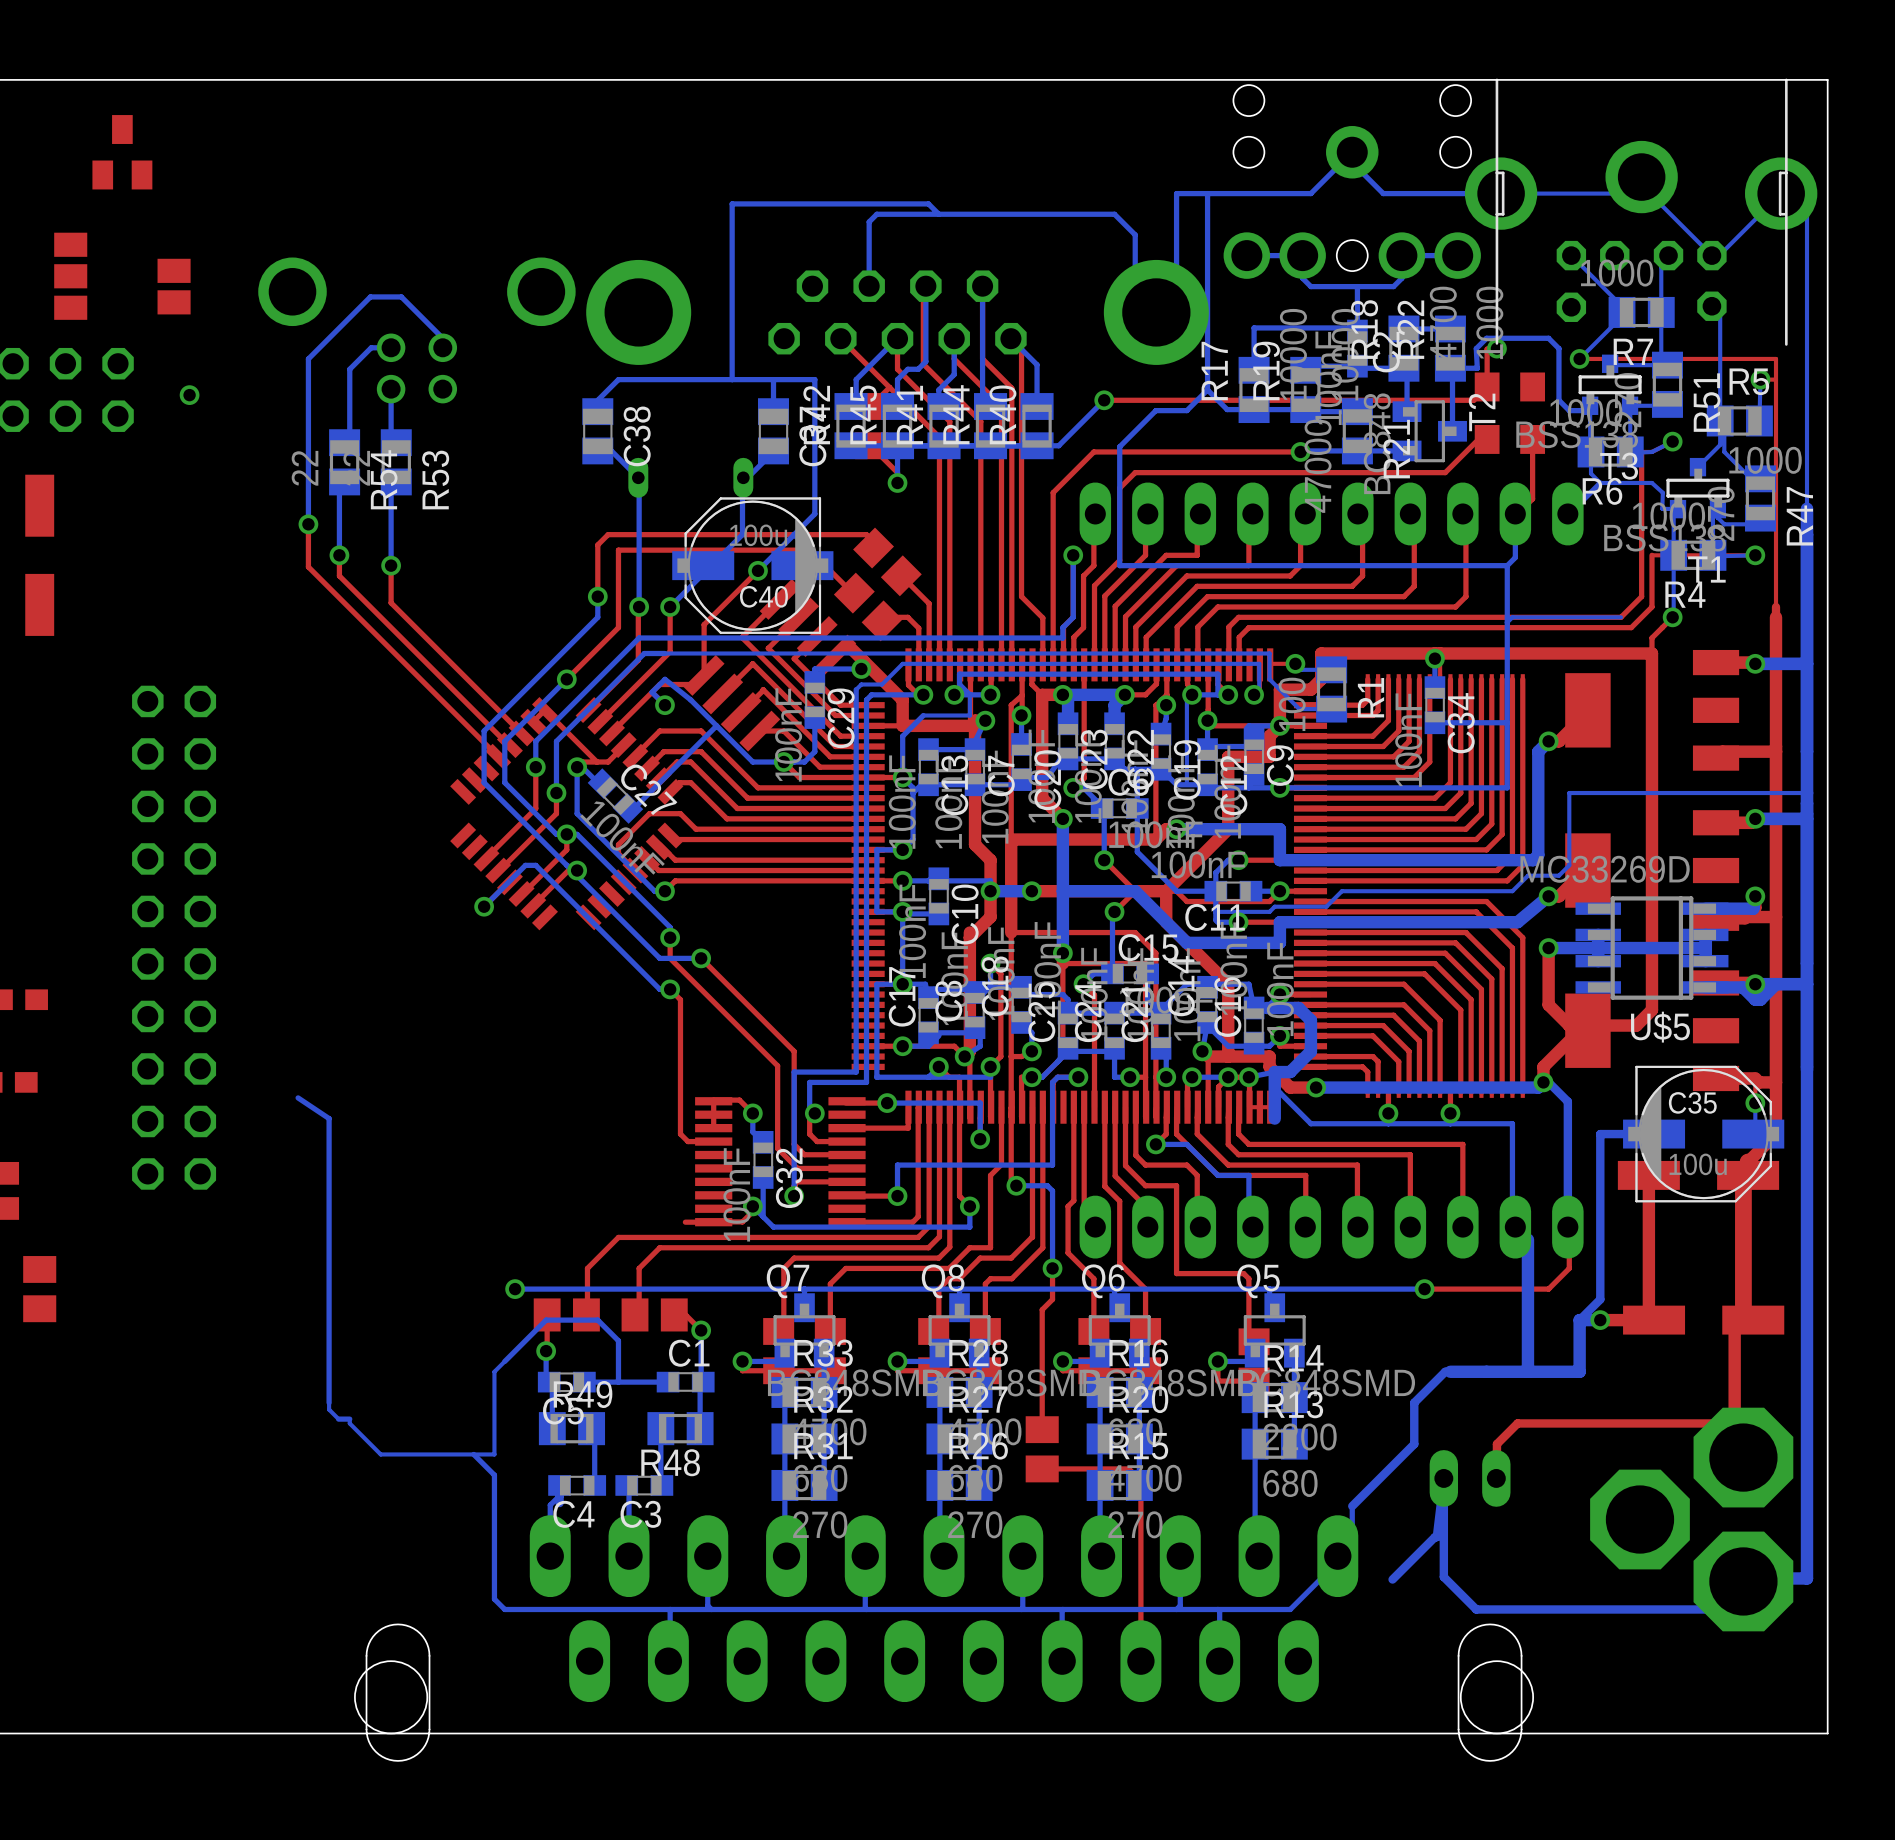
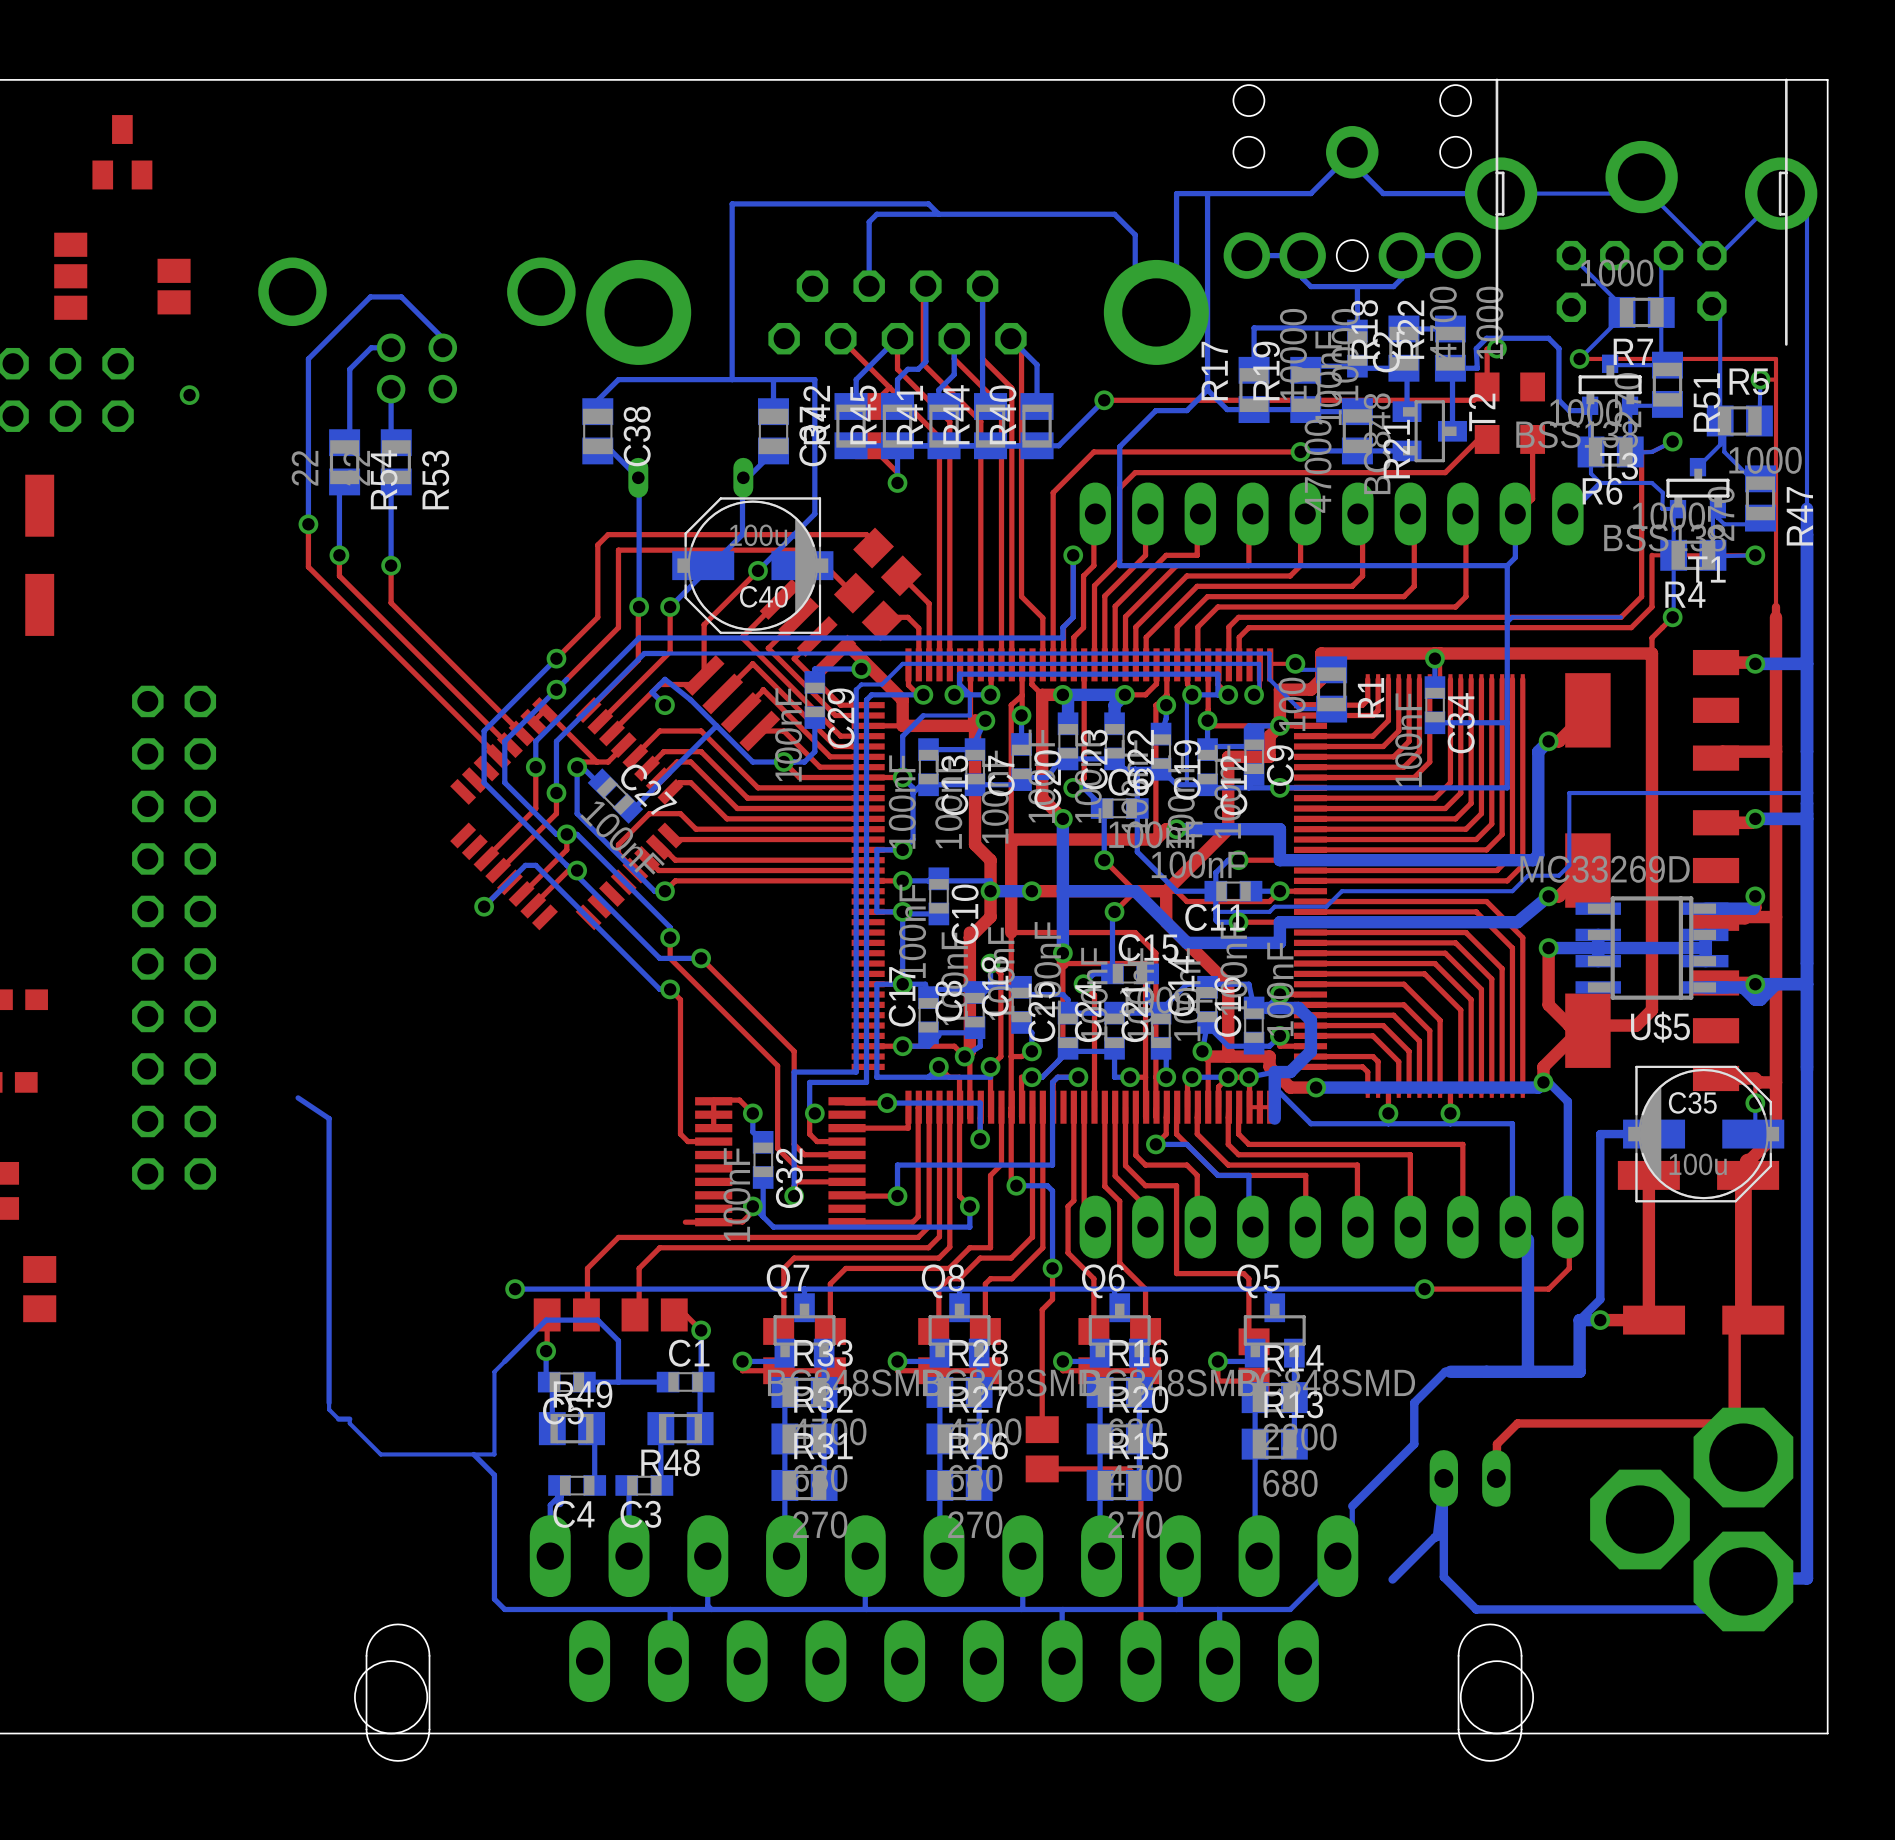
top track: none -> (597, 596) (597, 617) (556, 658)
bottom track: (597, 596) (597, 617) (556, 658) -> none
via: (597, 596) -> none
via: none -> (556, 658)
via position: (566, 679) -> (556, 689)

